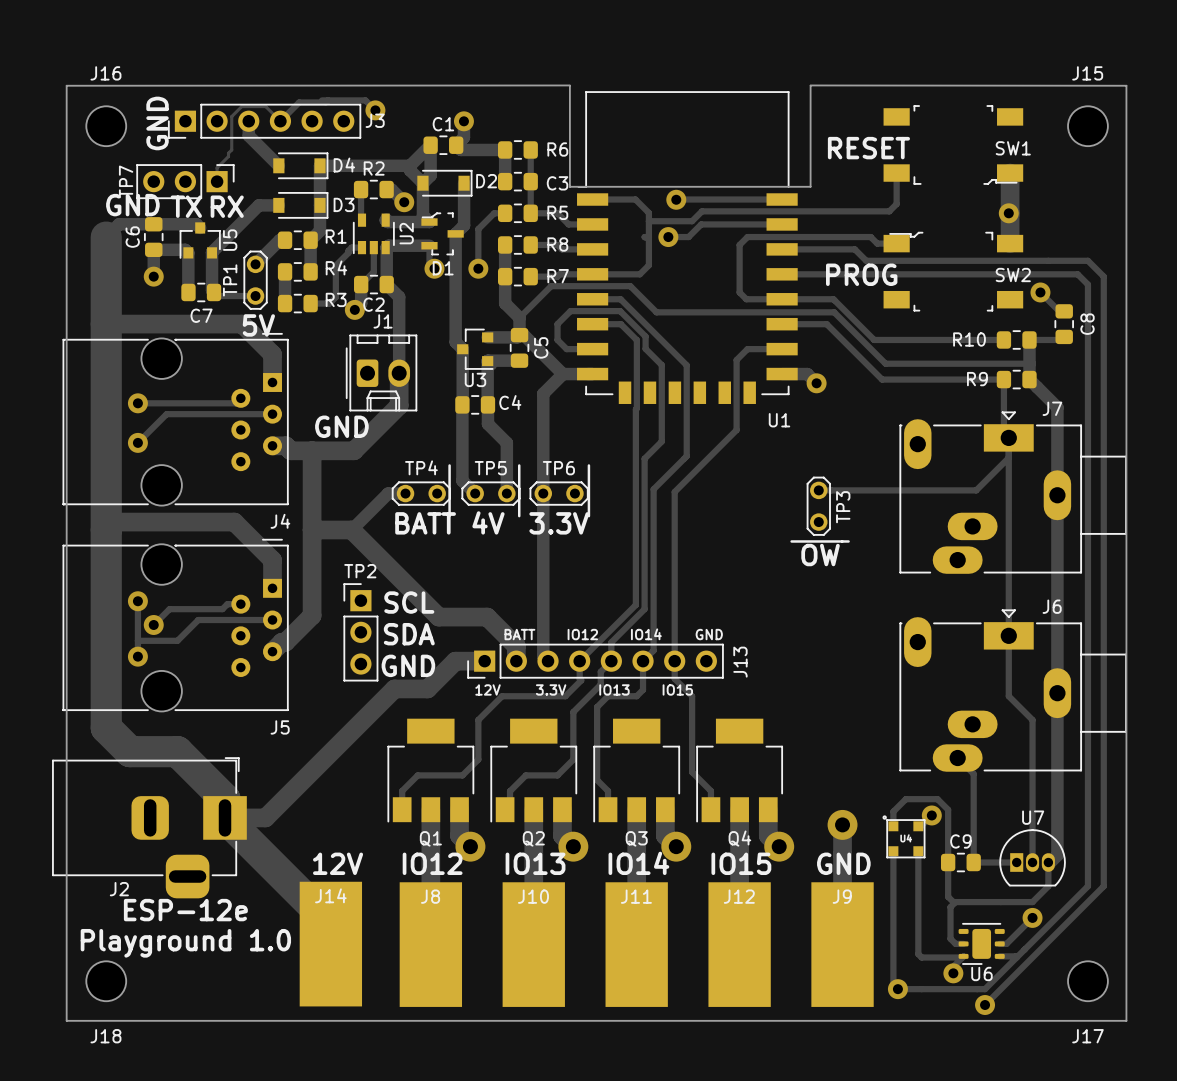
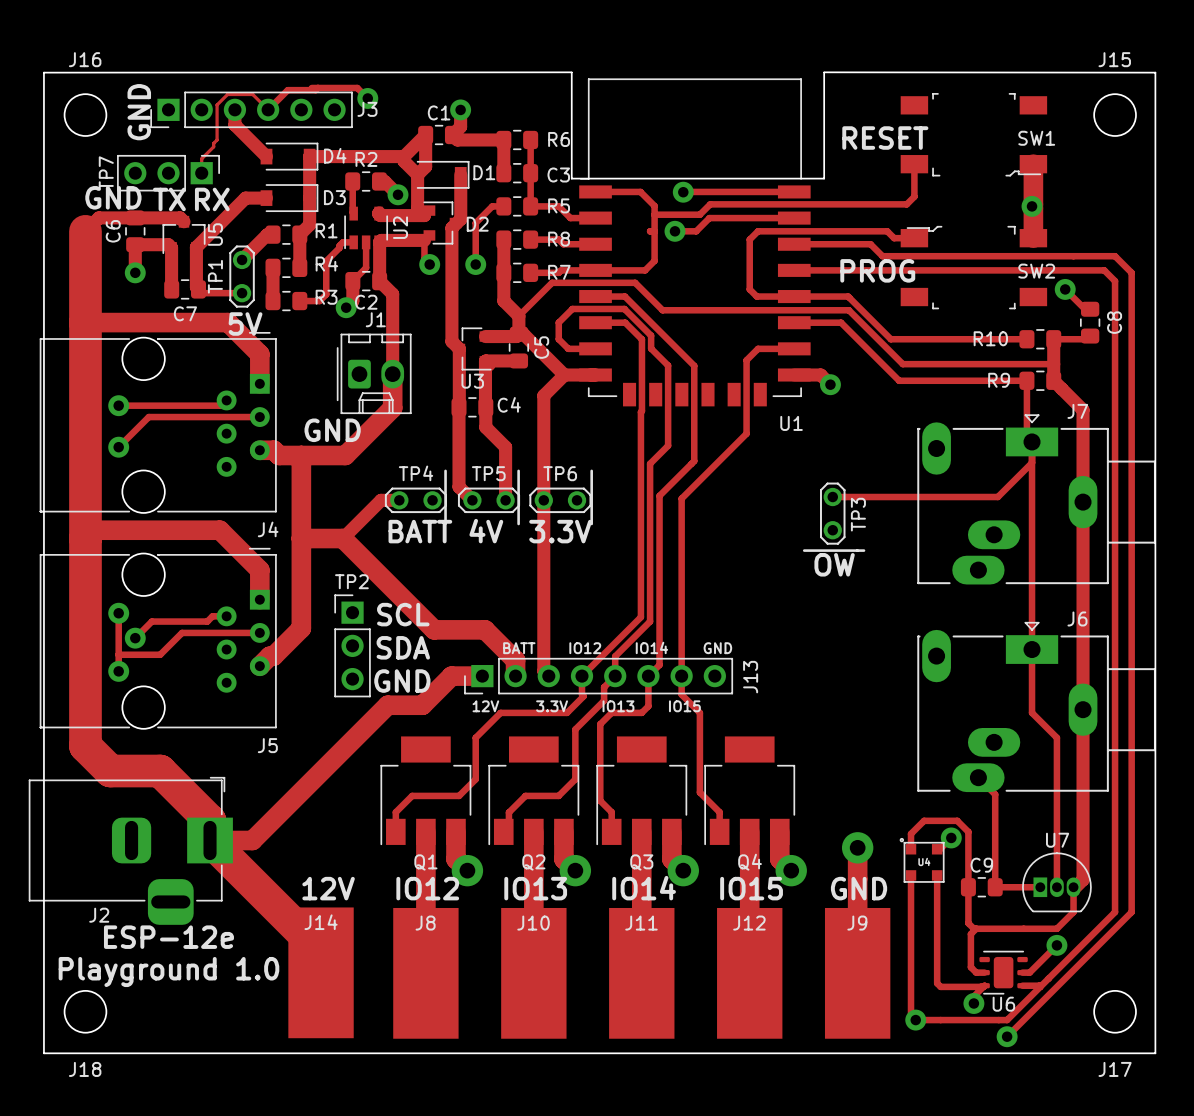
D2 name: D2 (486, 181) -> D1 (484, 172)
D2: none -> (442, 223)
D1: (442, 233) -> none

